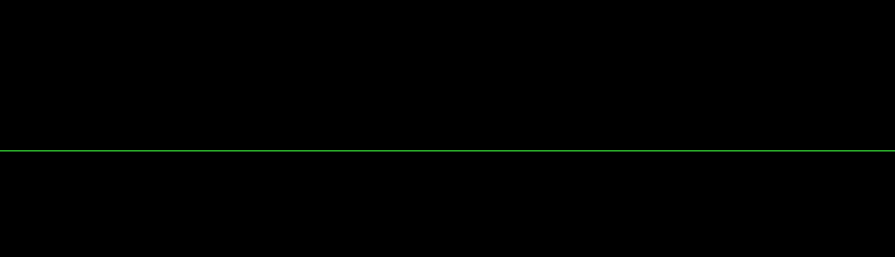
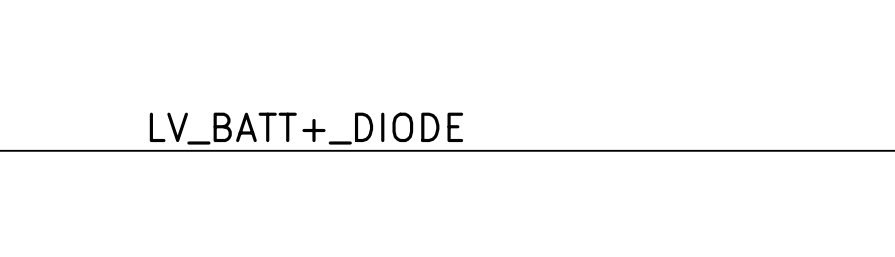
label: none -> LV_BATT+_DIODE (306, 128)

